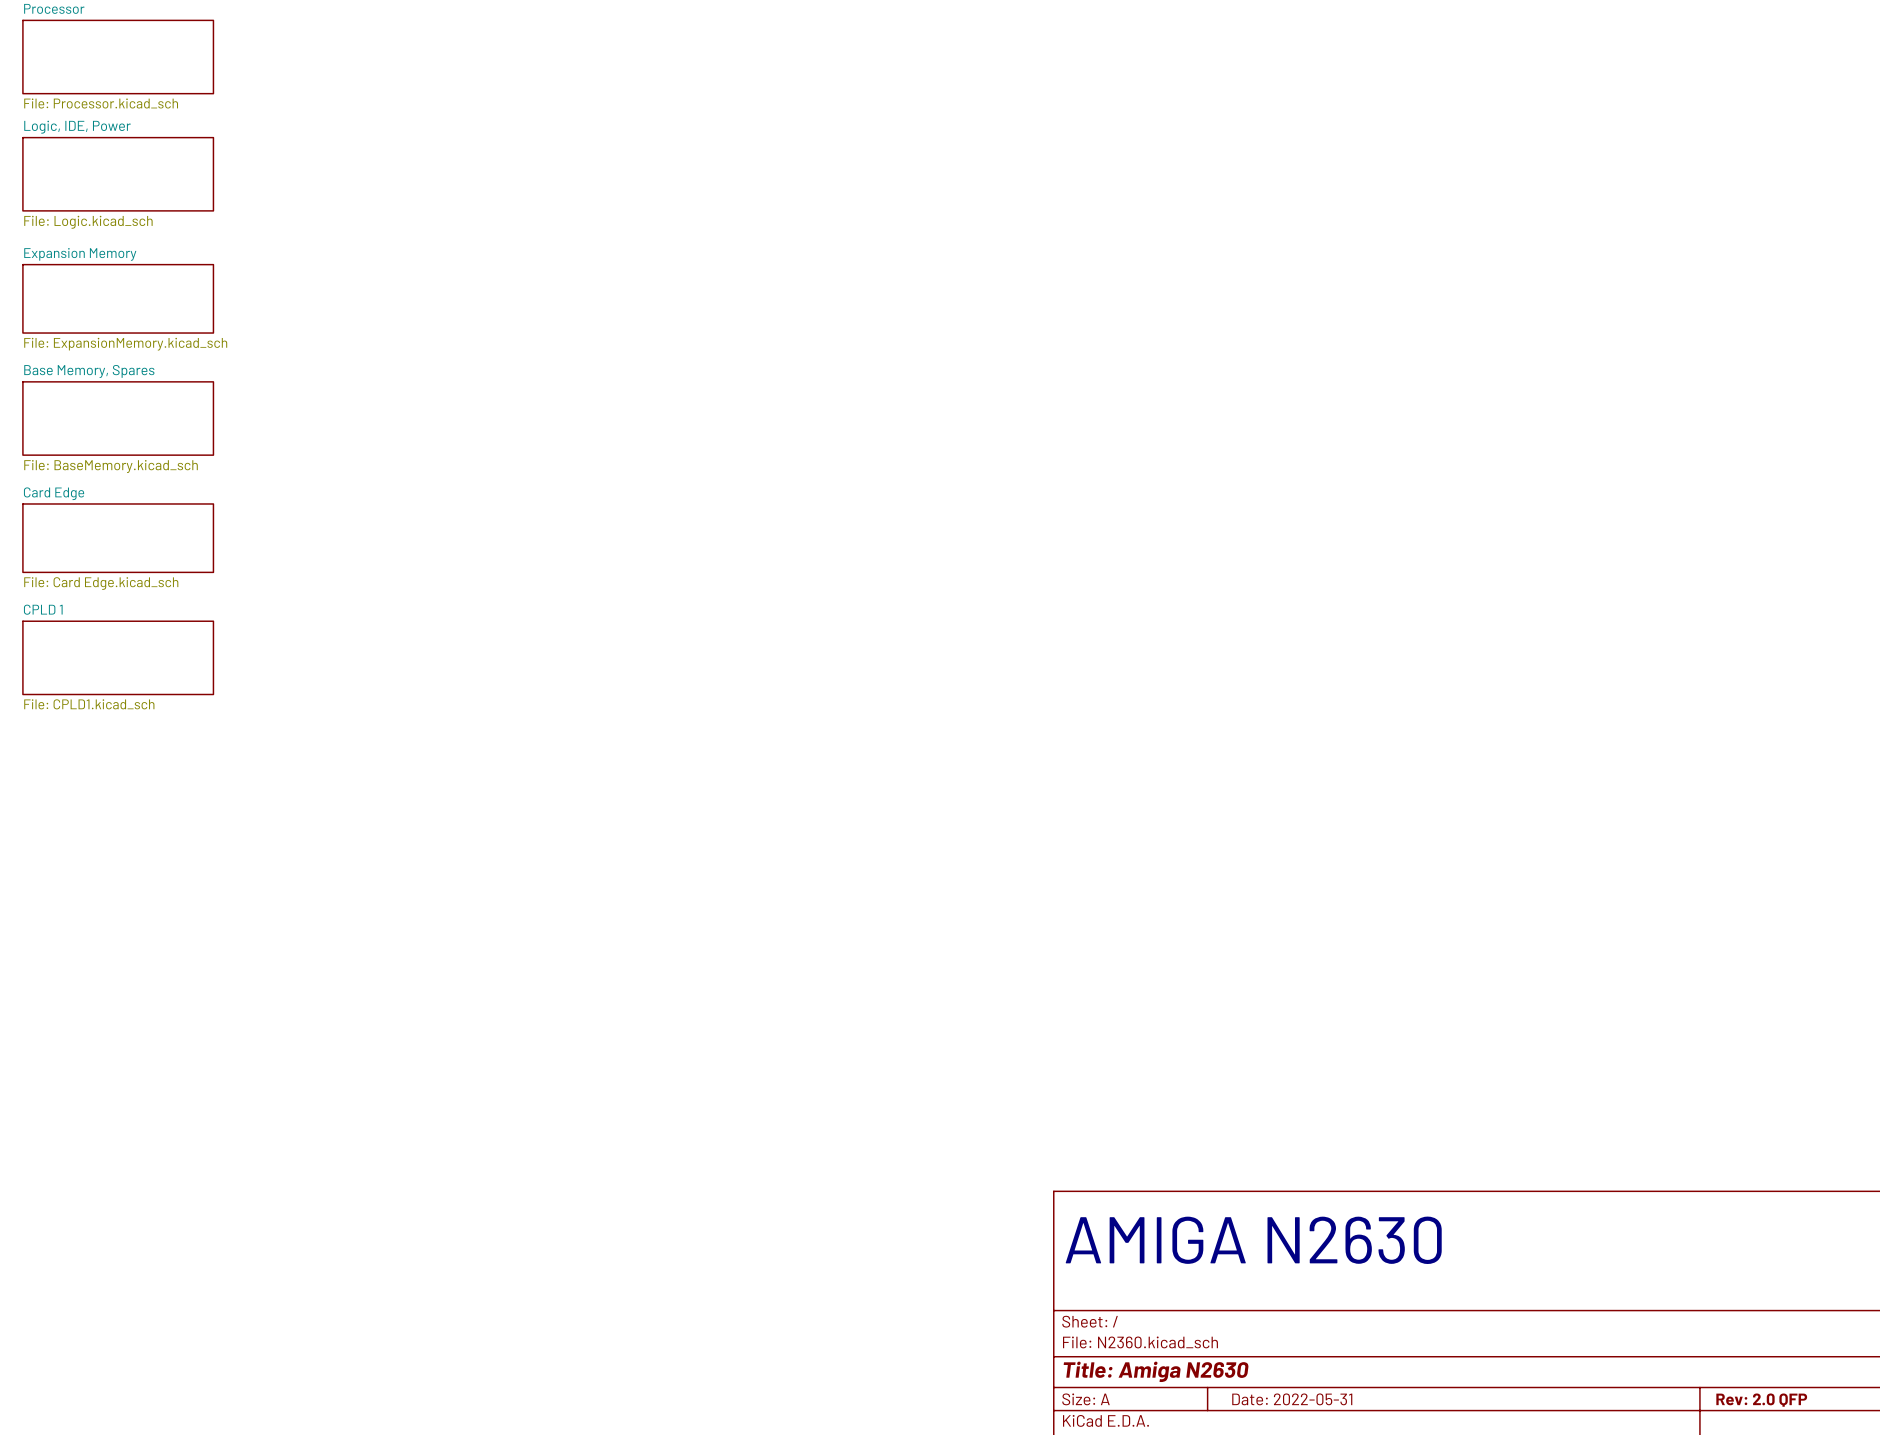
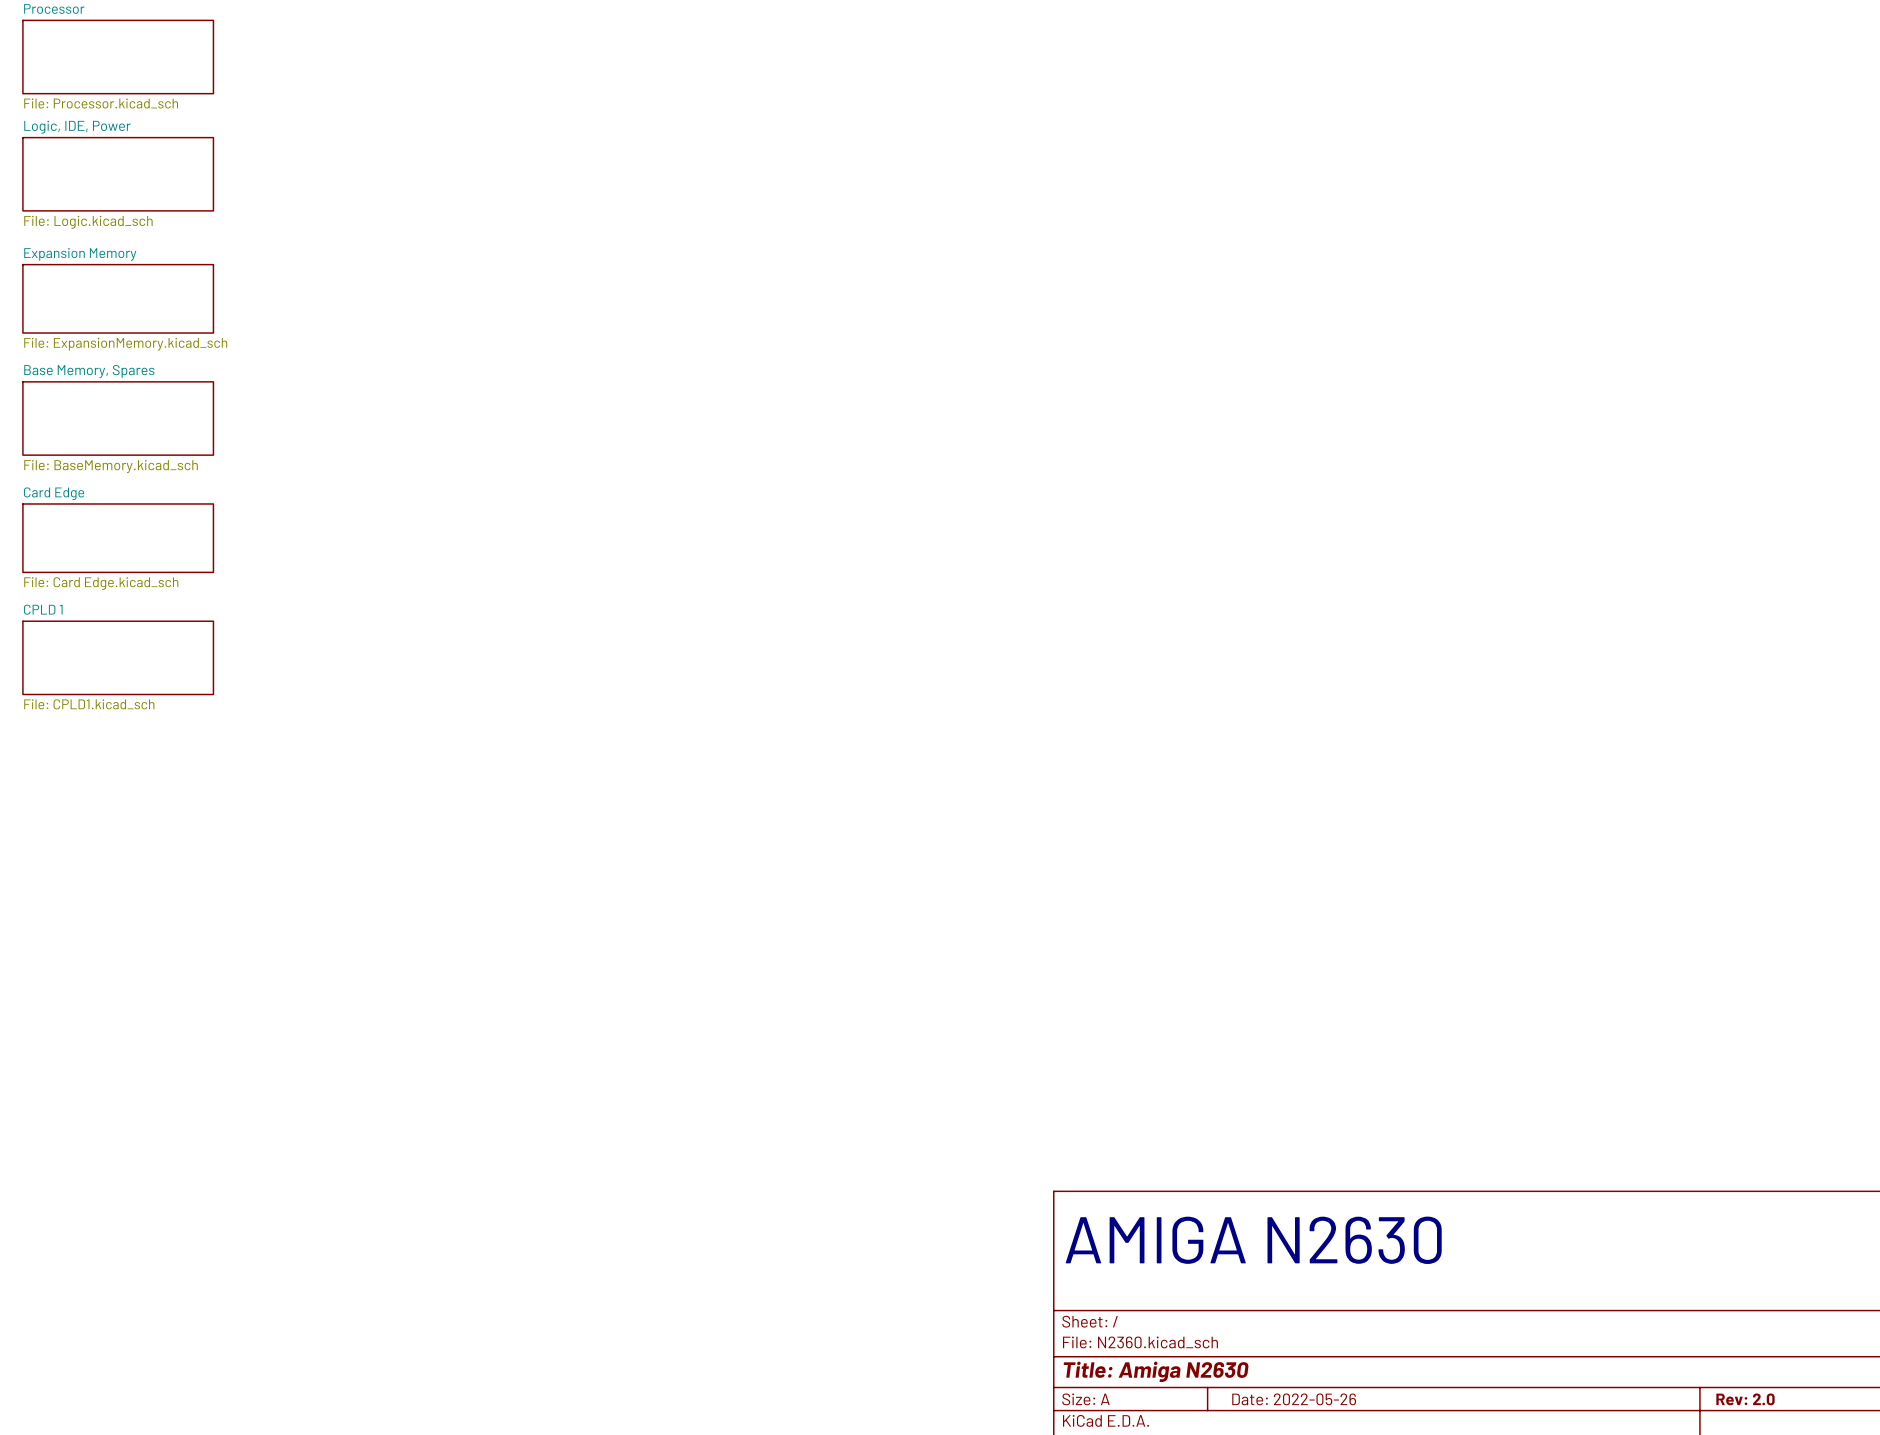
title block: Date: 2022-05-31 (1292, 1399) -> Date: 2022-05-26 (1294, 1399)
title block: Rev: 2.0 QFP (1761, 1400) -> Rev: 2.0 (1745, 1399)

